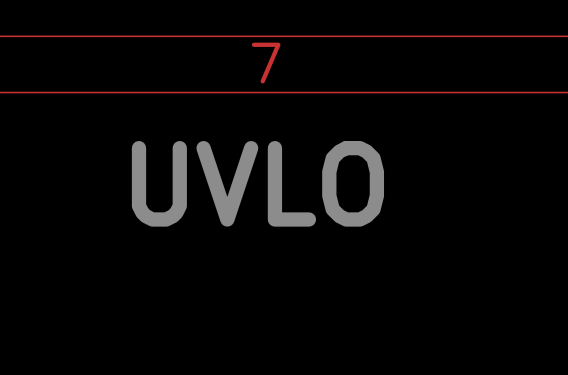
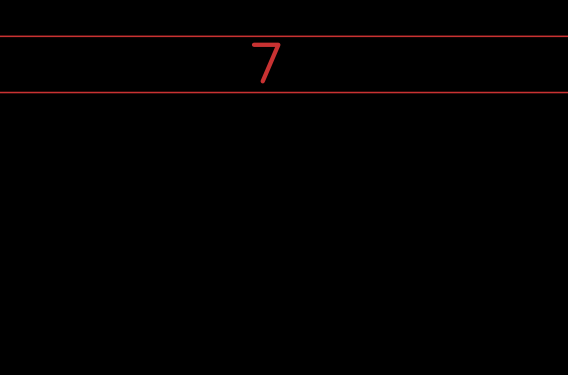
text: UVLO (257, 183) -> none

